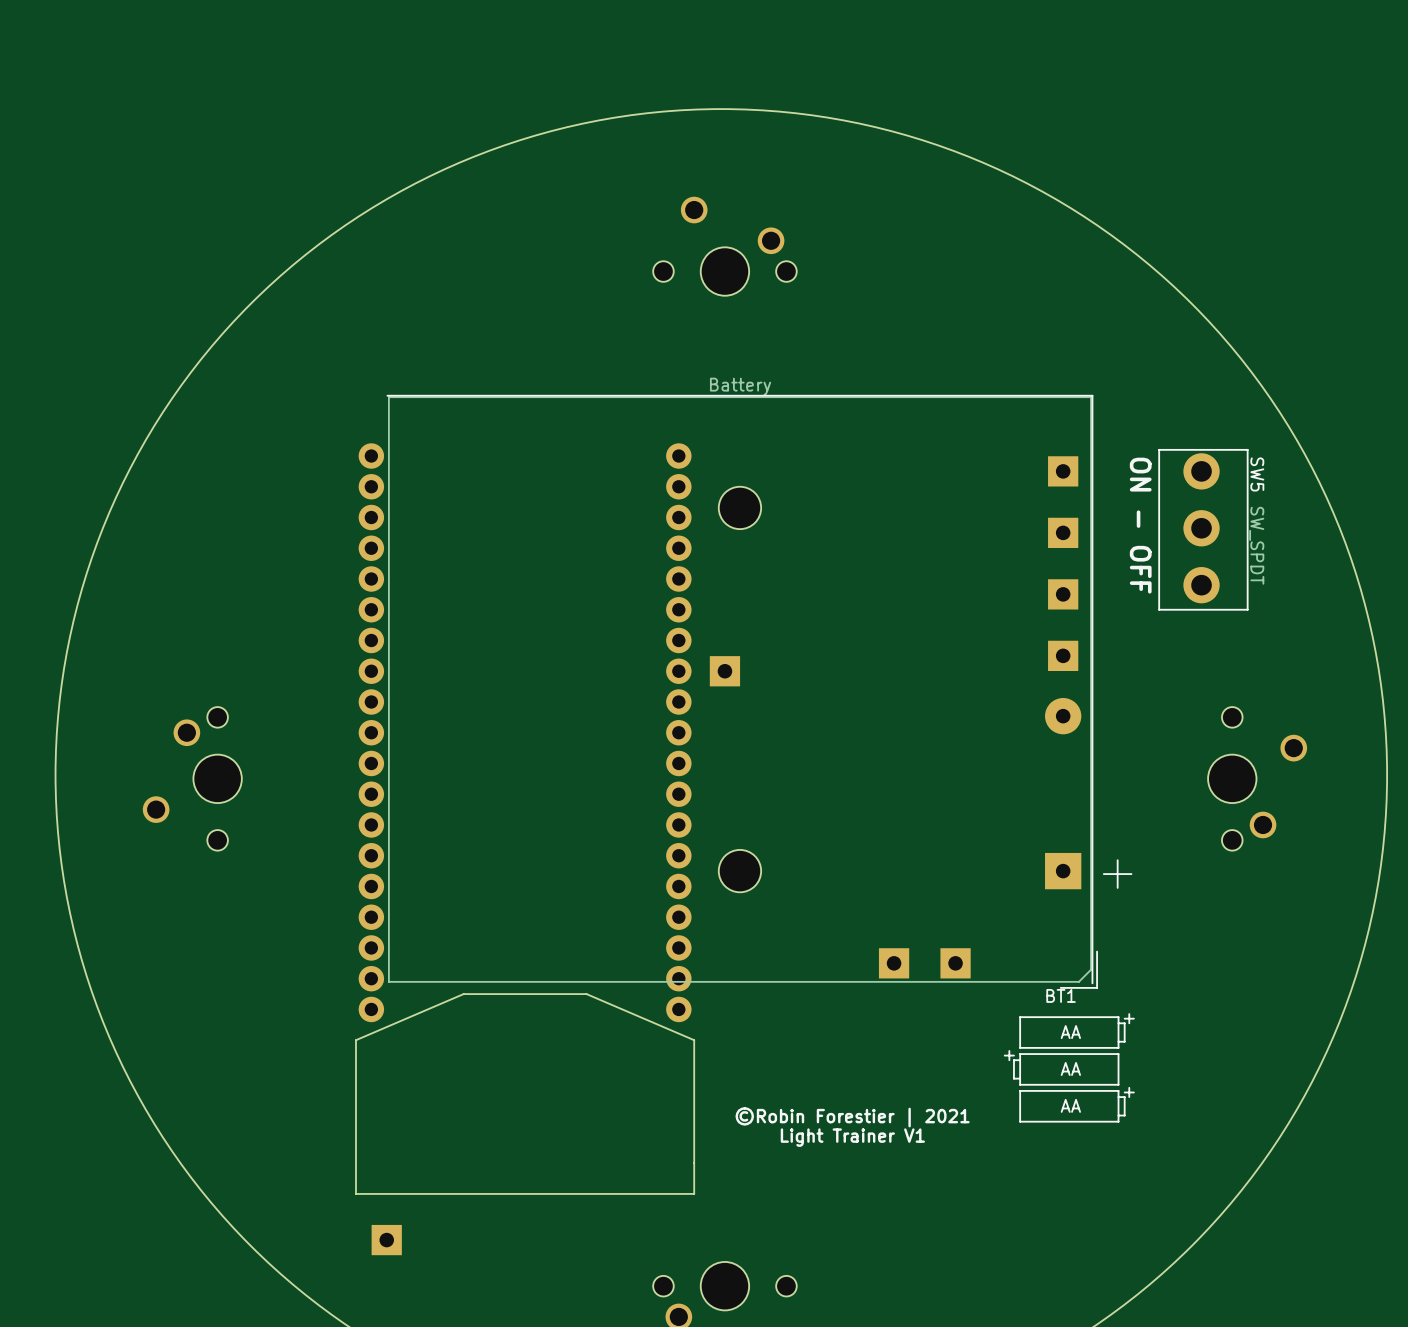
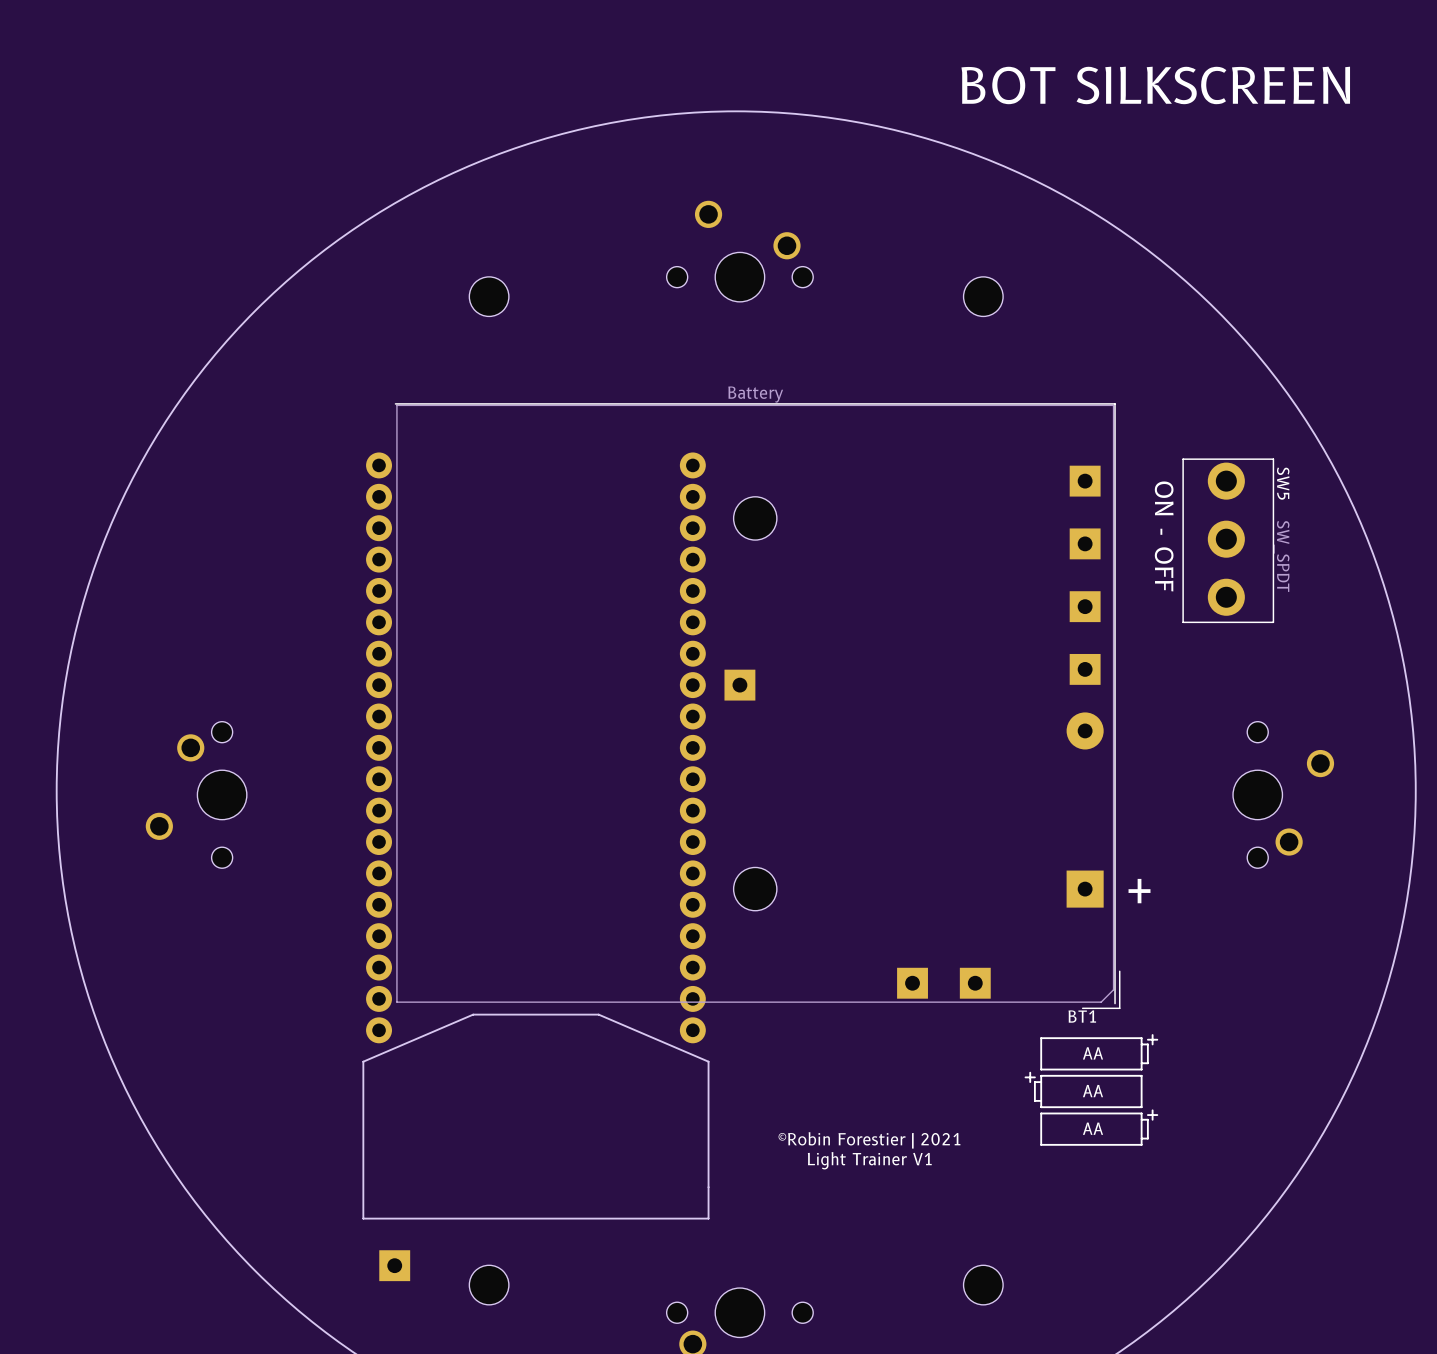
text: none -> BOT SILKSCREEN (1155, 85)
part: none -> (489, 296)
part: none -> (983, 296)
part: none -> (489, 1285)
part: none -> (983, 1285)

